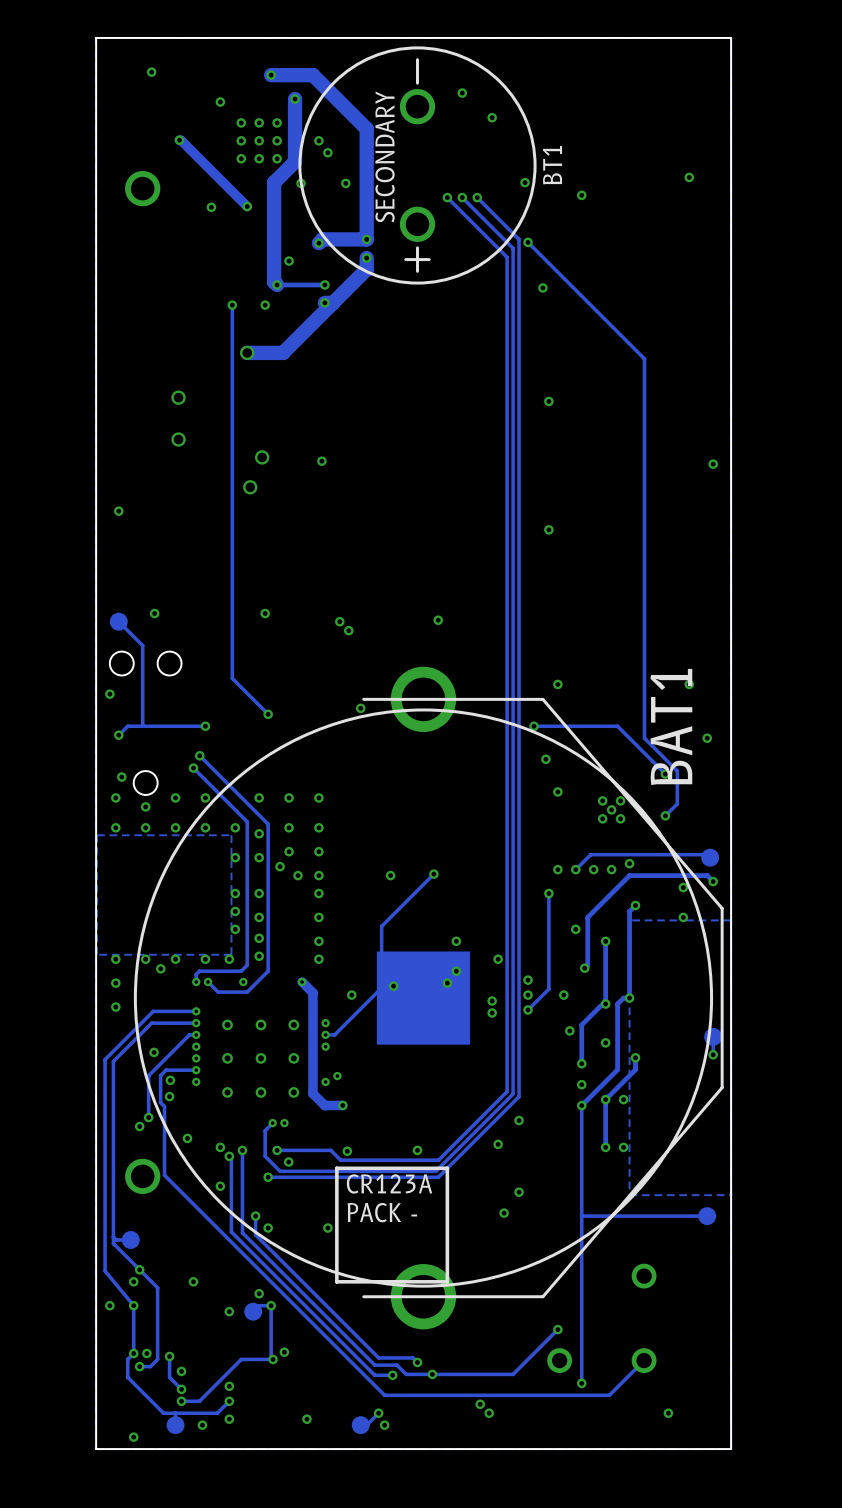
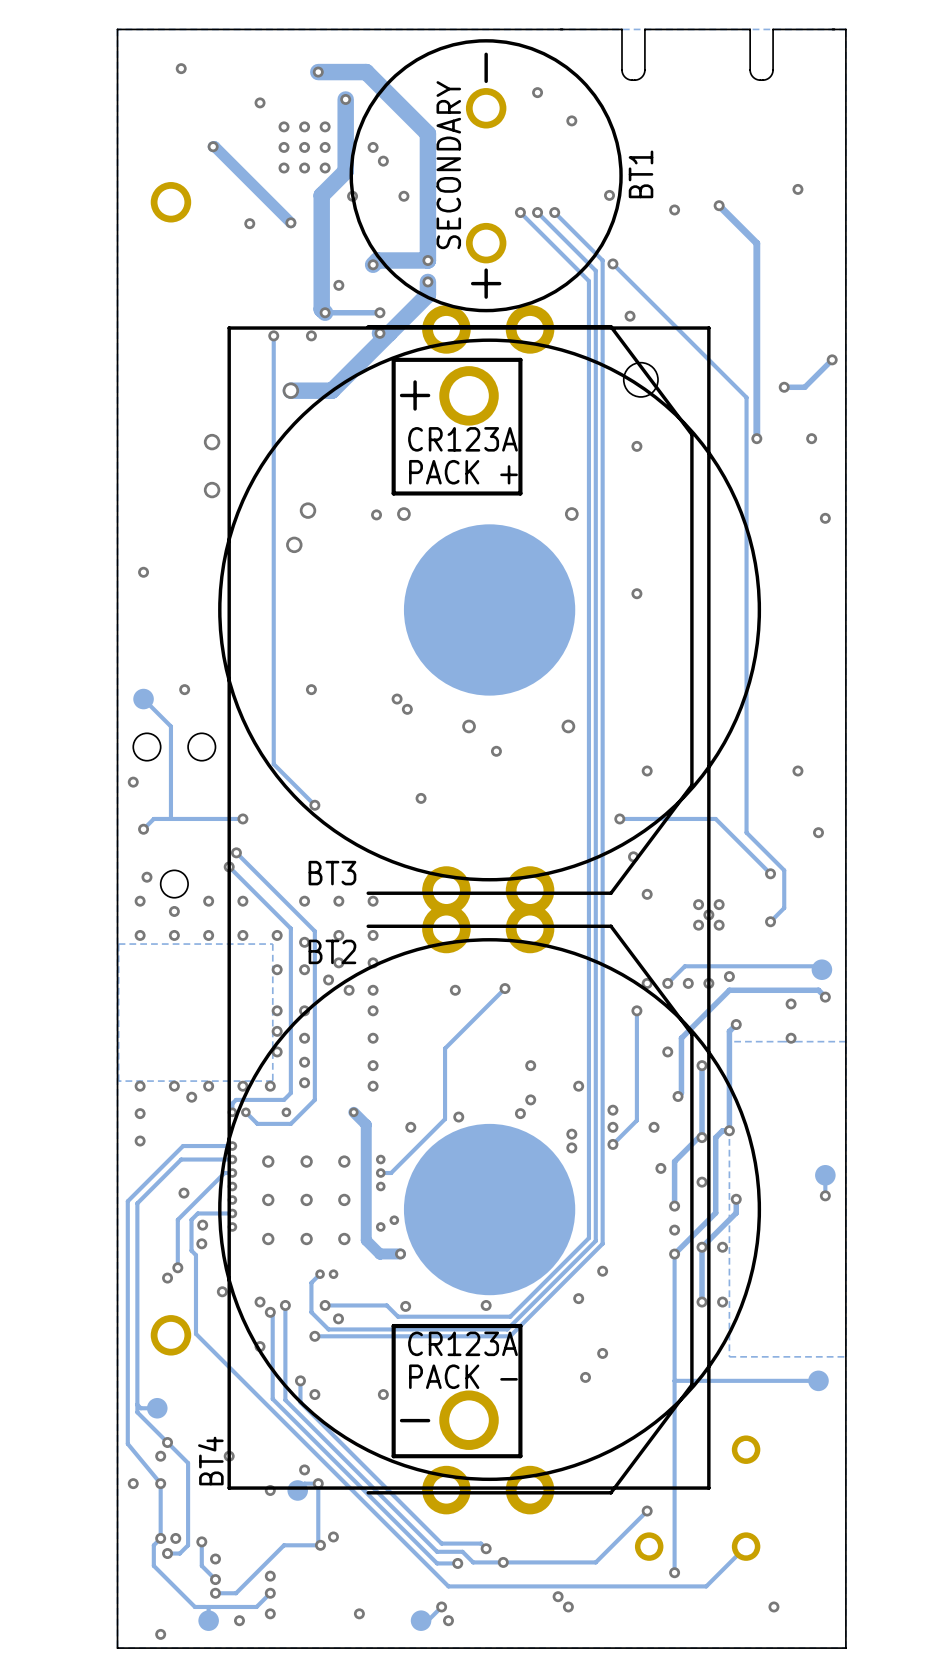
board edge: (719, 37) (484, 37) -> none
part: none -> (697, 54)
track: none -> (719, 205) (756, 243) (756, 438)
via: none -> (719, 205)
line: none -> (520, 359) (393, 359) (393, 493) (520, 493) (520, 359)
track: none -> (832, 359) (804, 387) (784, 387)
via: none -> (832, 359)
via: none -> (784, 387)
via: none -> (756, 438)
via: none -> (811, 438)
text: none -> CR123A (462, 439)
text: none -> PACK + (463, 472)
via: none -> (403, 514)
via: none -> (571, 514)
BT3: none -> (489, 609)
via position: (438, 620) -> (496, 751)
via: none -> (469, 726)
via: none -> (568, 726)
BT4: none -> (469, 908)
BAT1: (428, 998) -> none
BT2: none -> (489, 1209)

